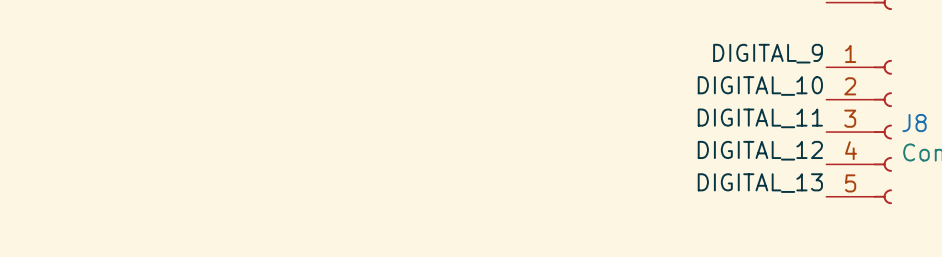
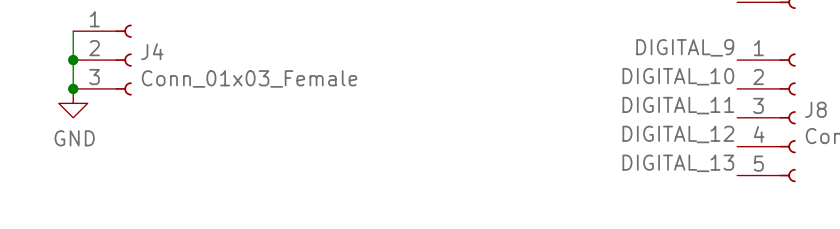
wire: none -> (73, 31) (73, 88)
junction: none -> (73, 60)
J4: none -> Conn_01x03_Female (102, 60)
junction: none -> (73, 88)
power symbol: none -> GND (73, 103)

